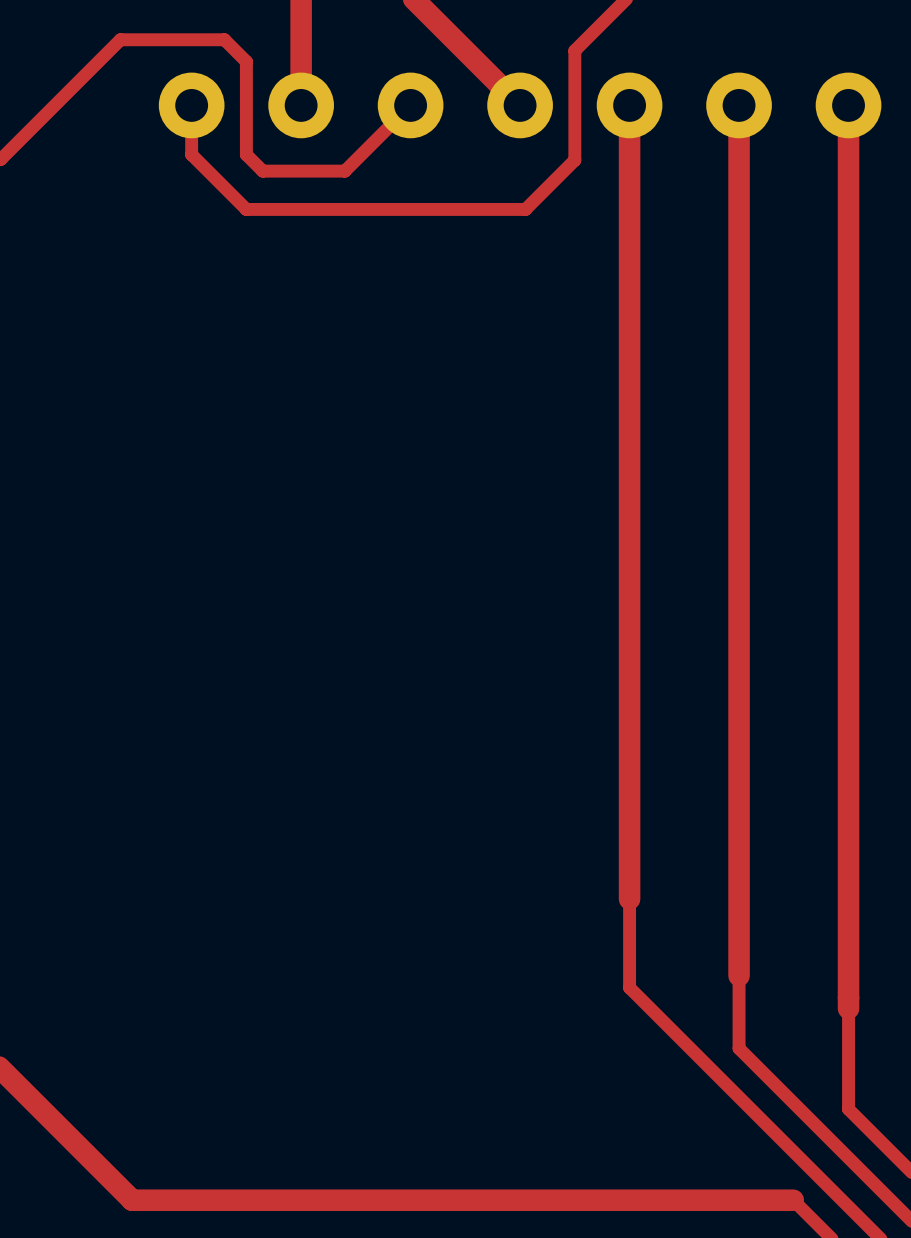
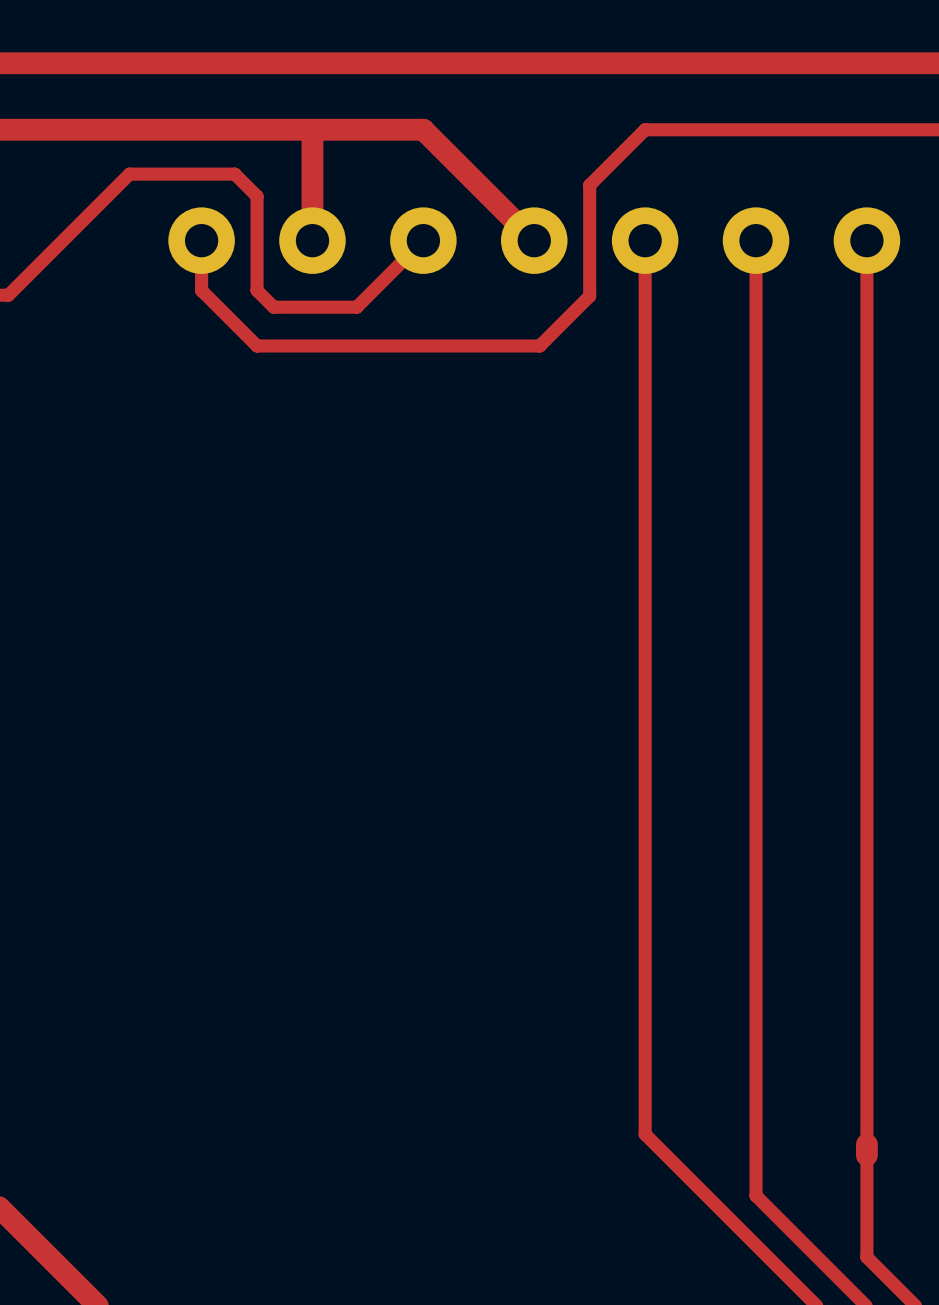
track width: thick (629, 105) (629, 899) -> thin (645, 240) (645, 1044)
track width: thick (739, 105) (739, 975) -> thin (756, 240) (756, 1122)
track width: thick (848, 105) (848, 997) -> thin (866, 240) (866, 1144)

